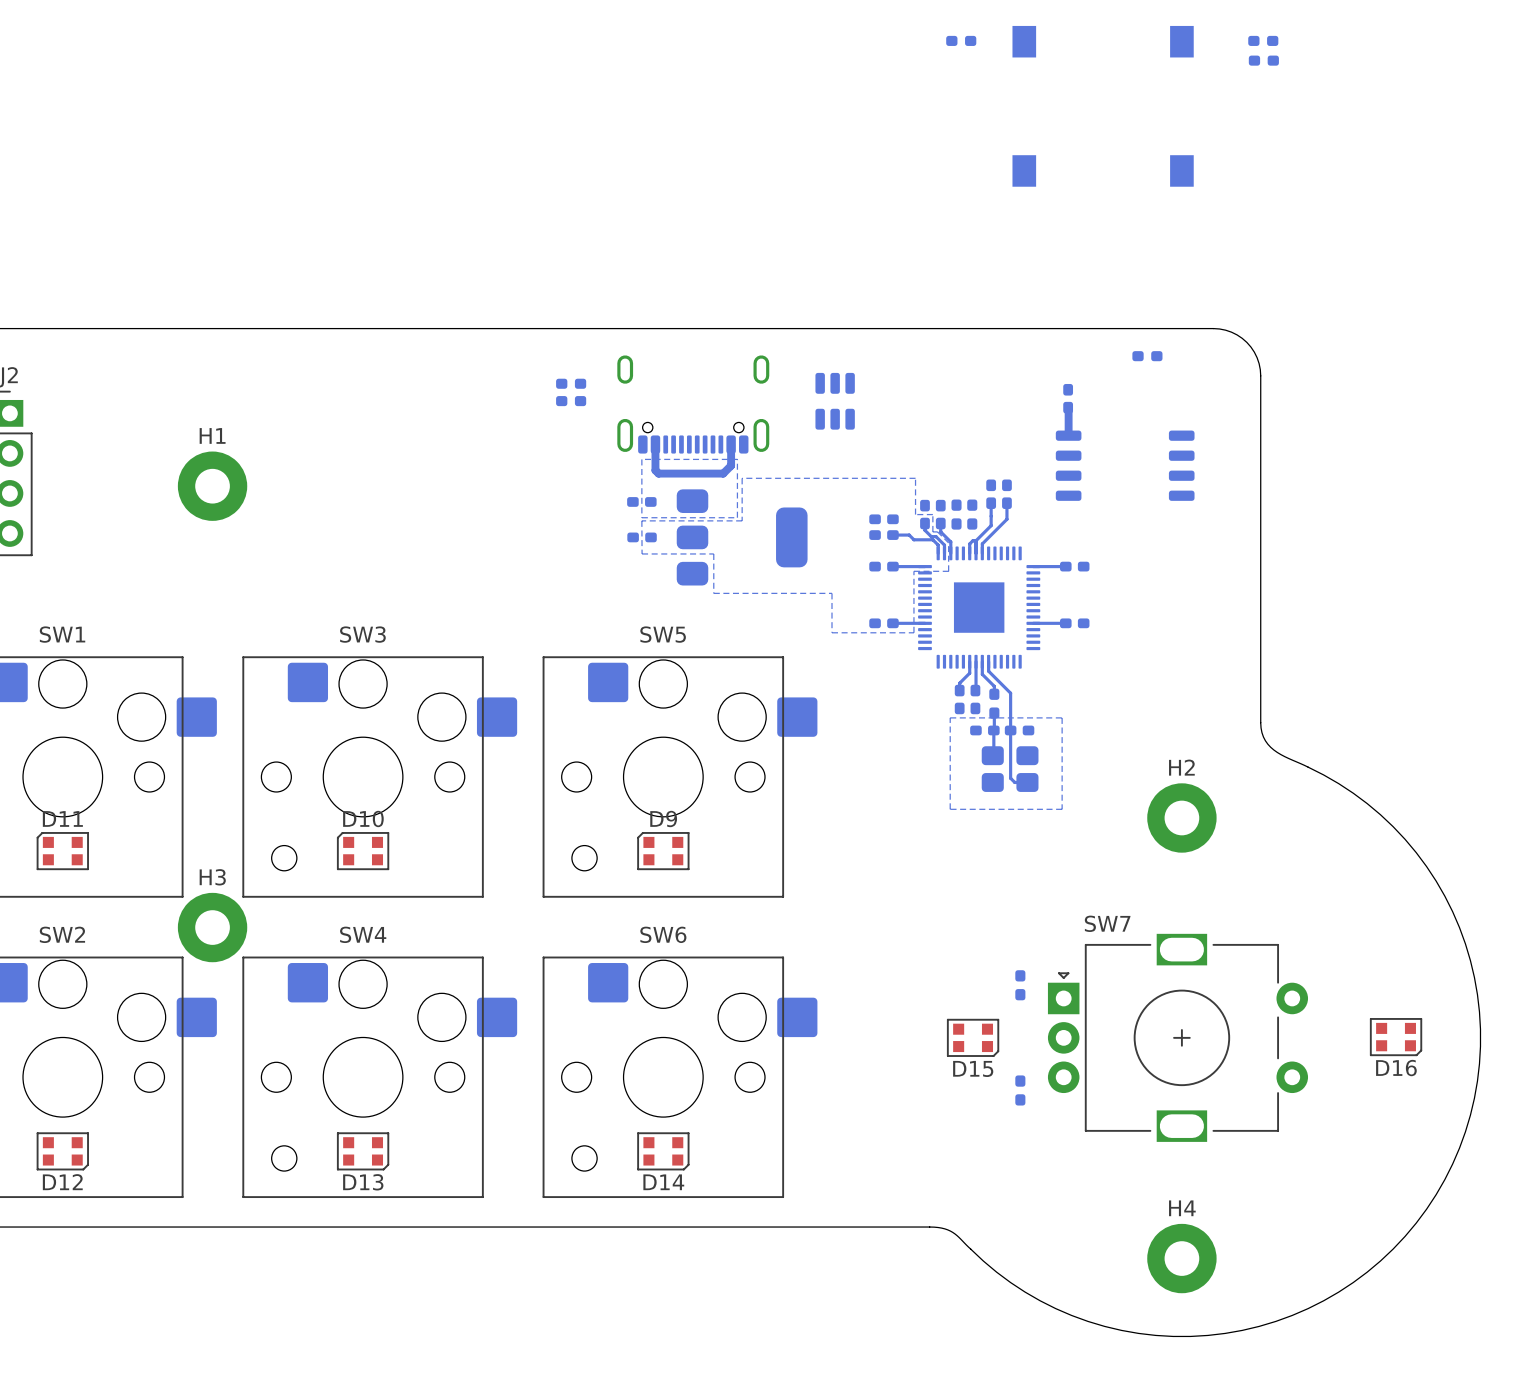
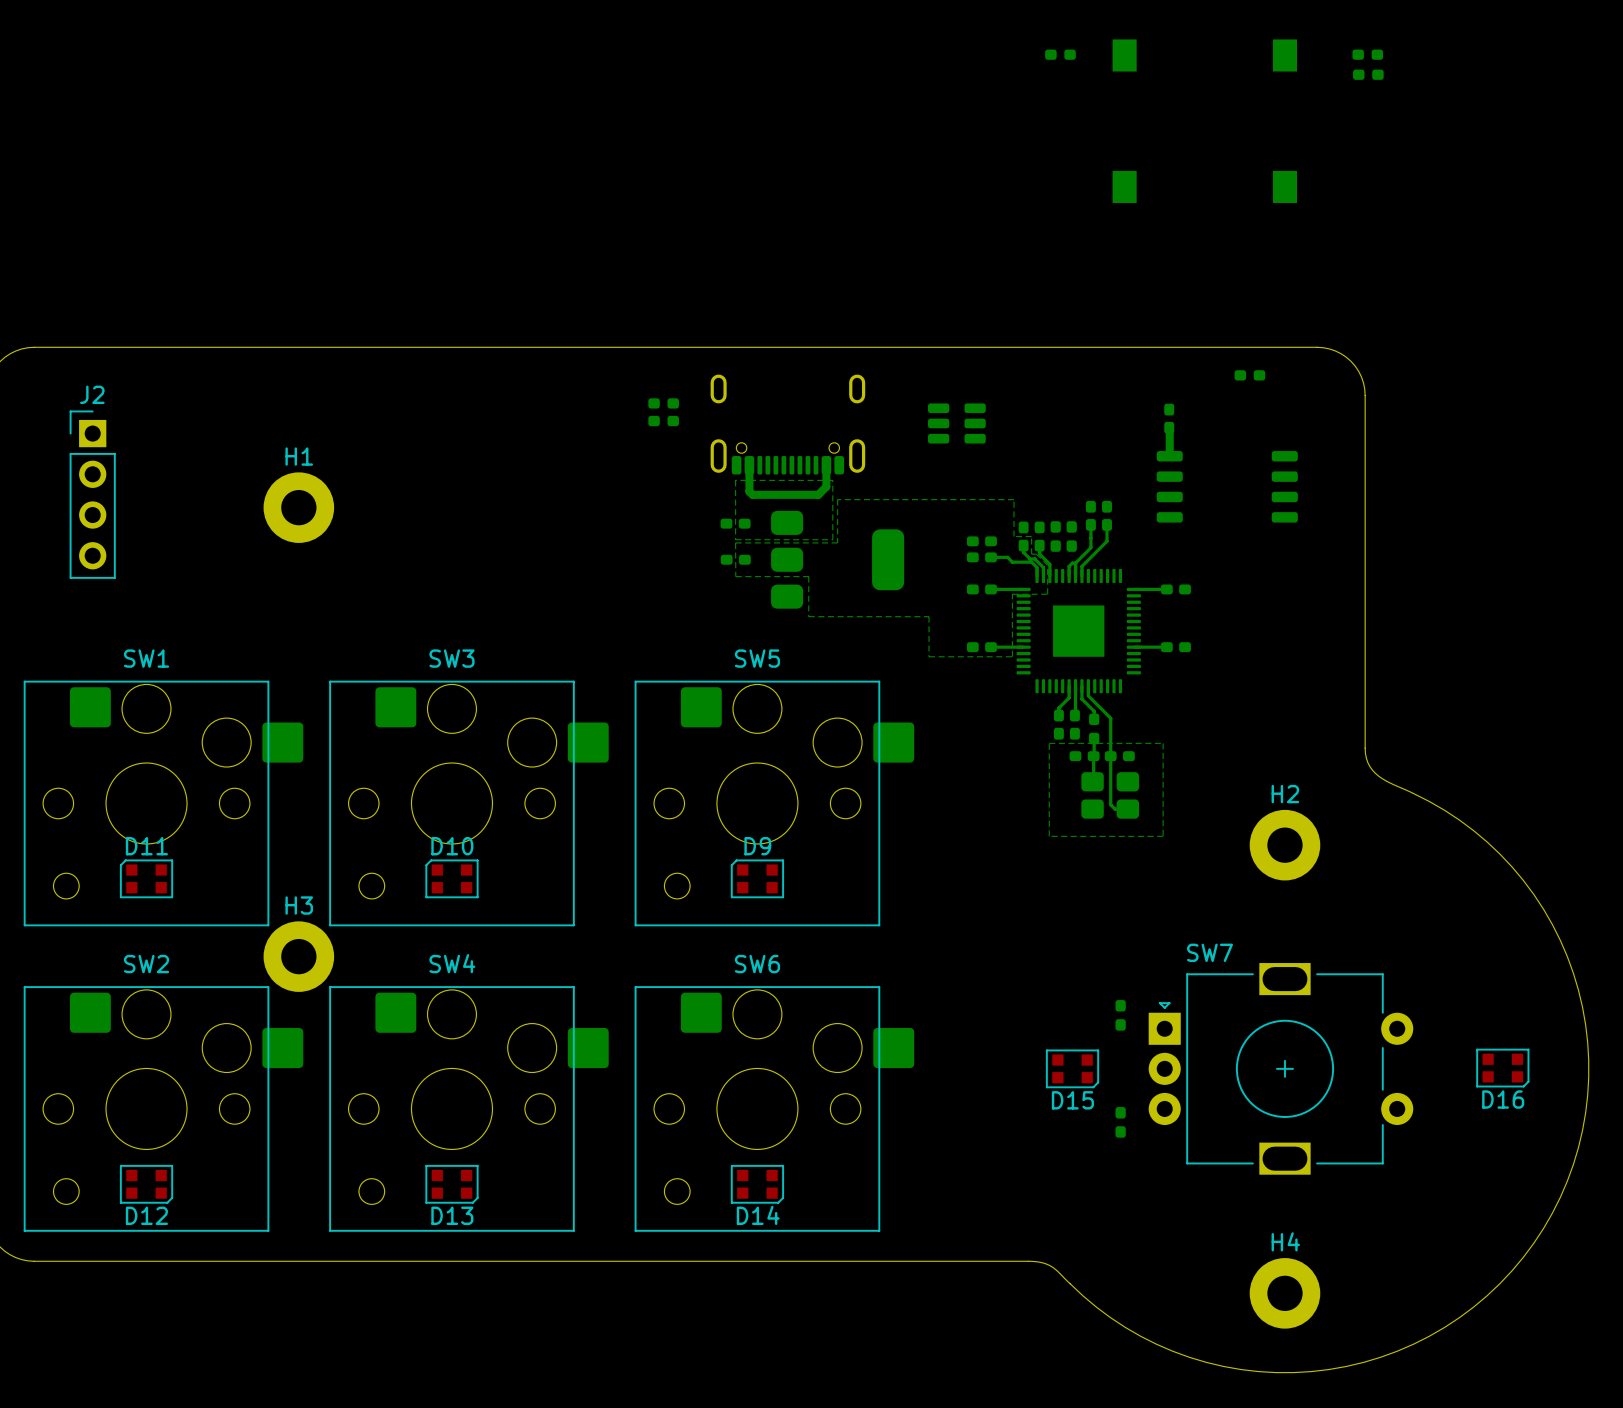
part rotation: 0° (835, 401) -> 90° clockwise (956, 423)

